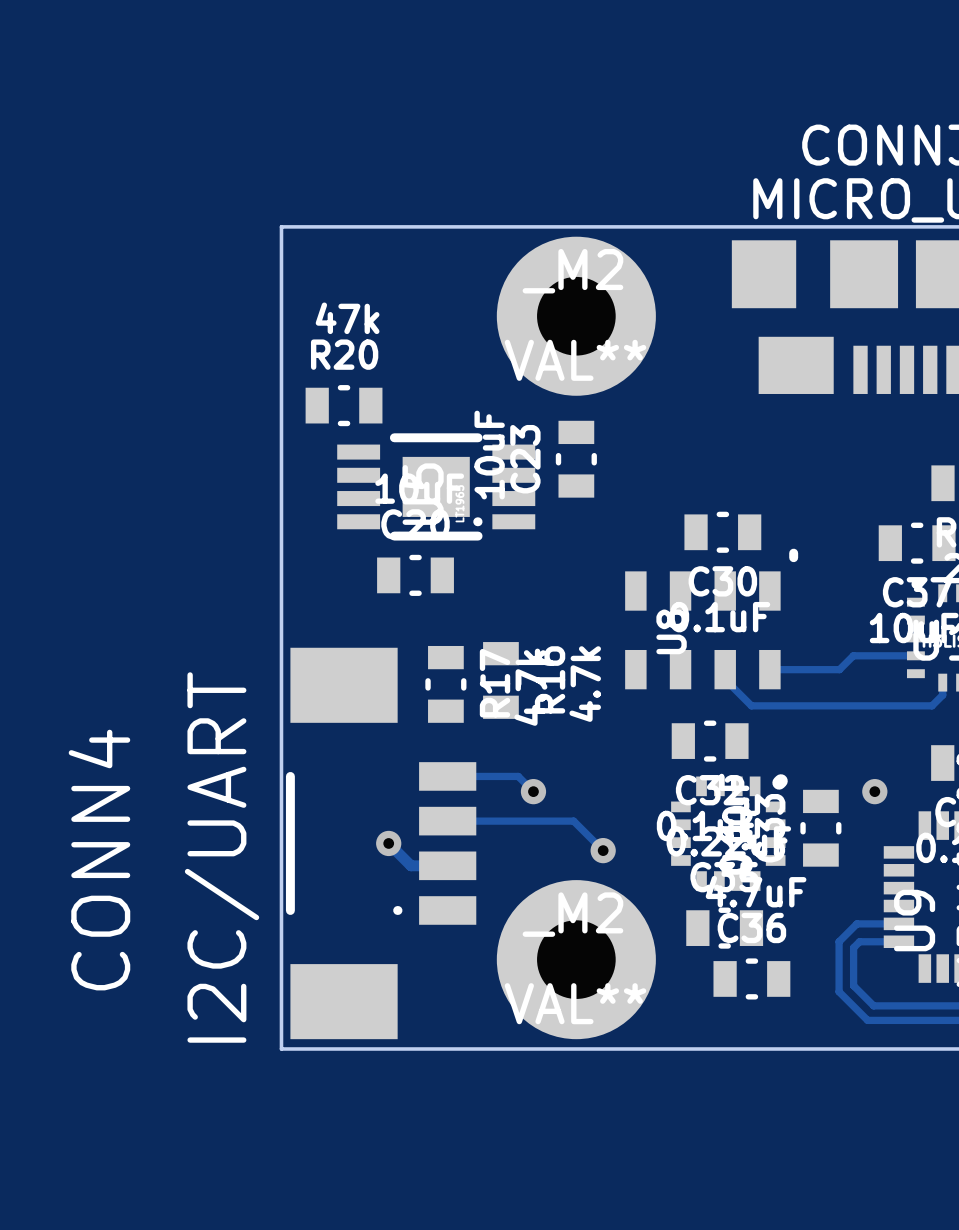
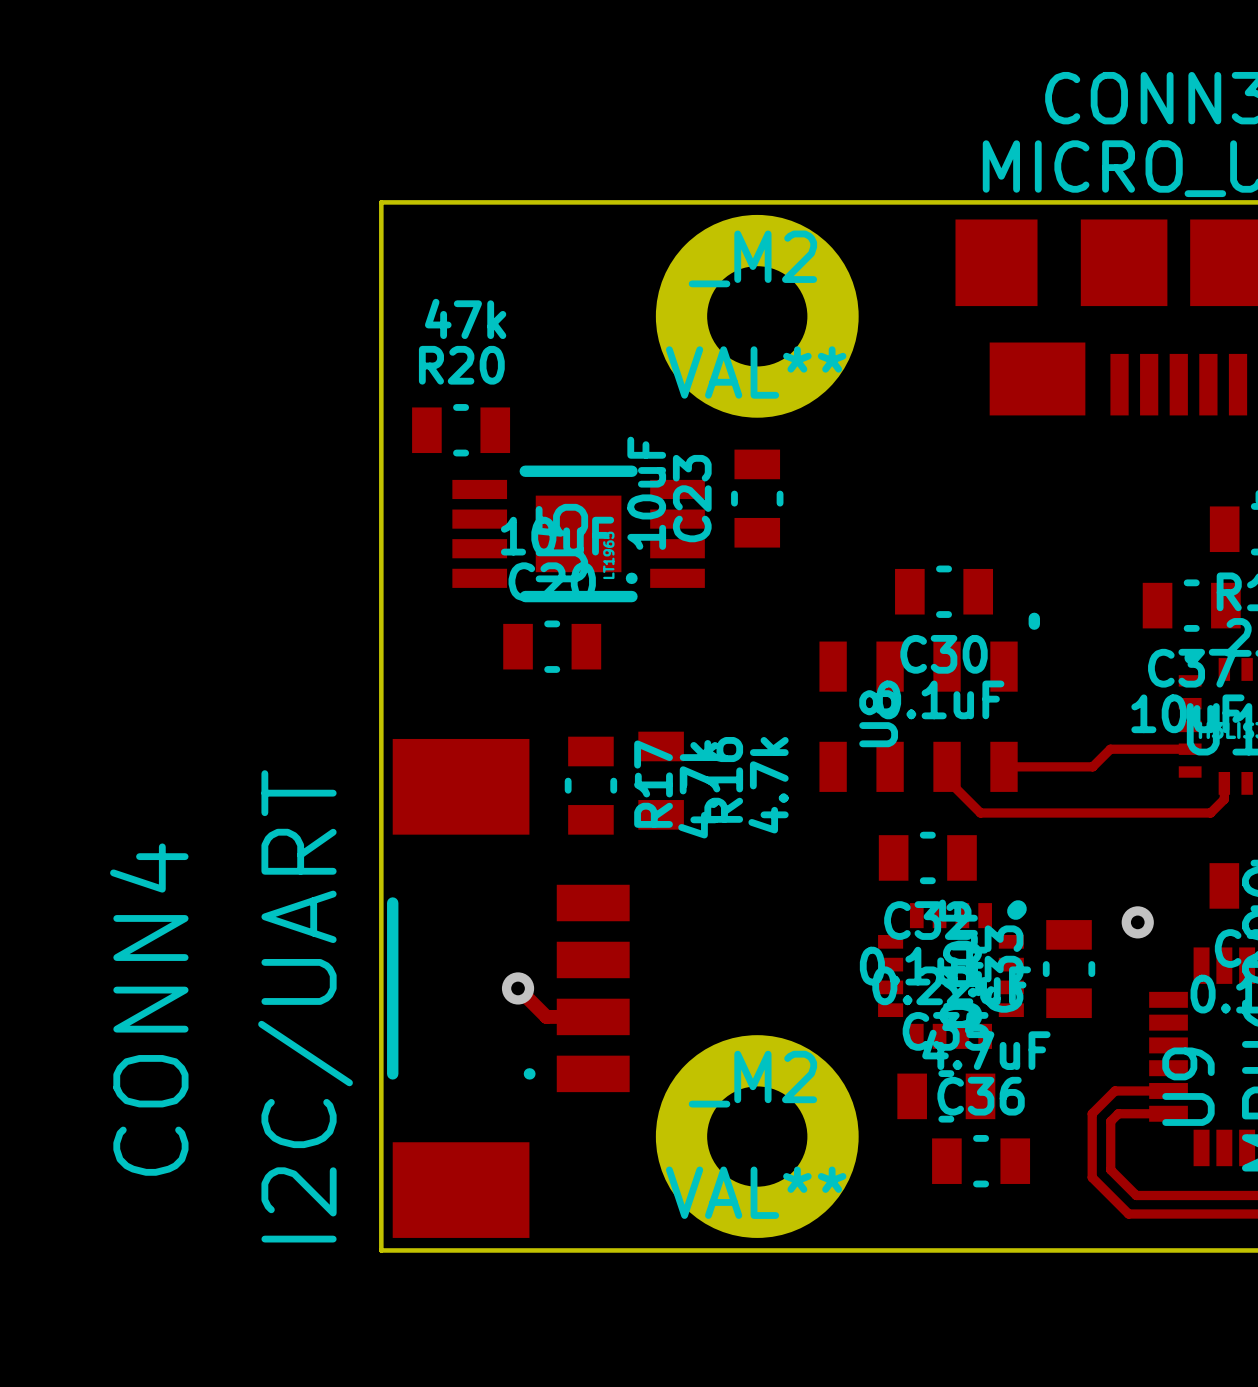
track: (447, 776) (518, 776) (533, 791) -> none
via: (533, 791) -> none
track: (447, 821) (573, 821) (603, 850) -> none
via: (603, 850) -> none

